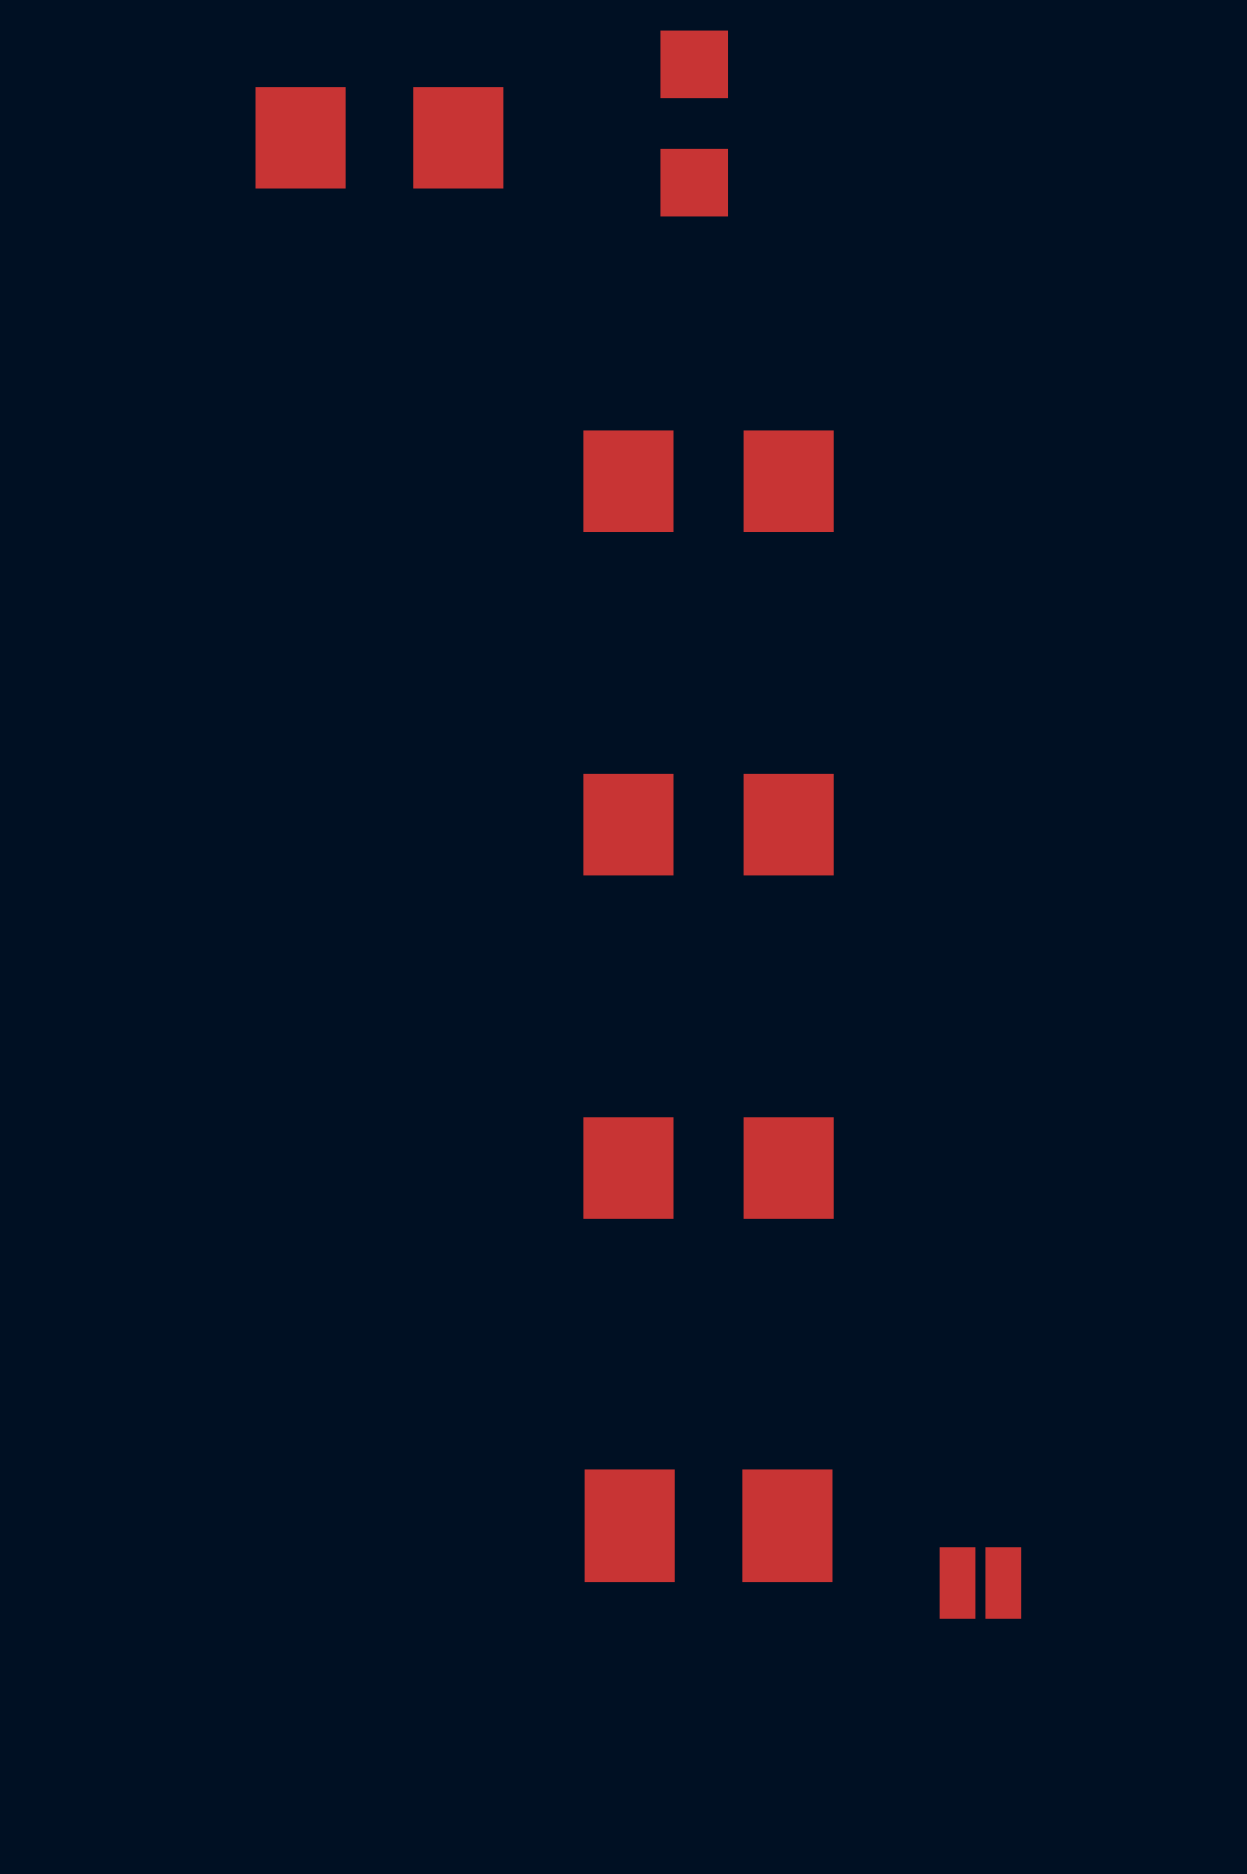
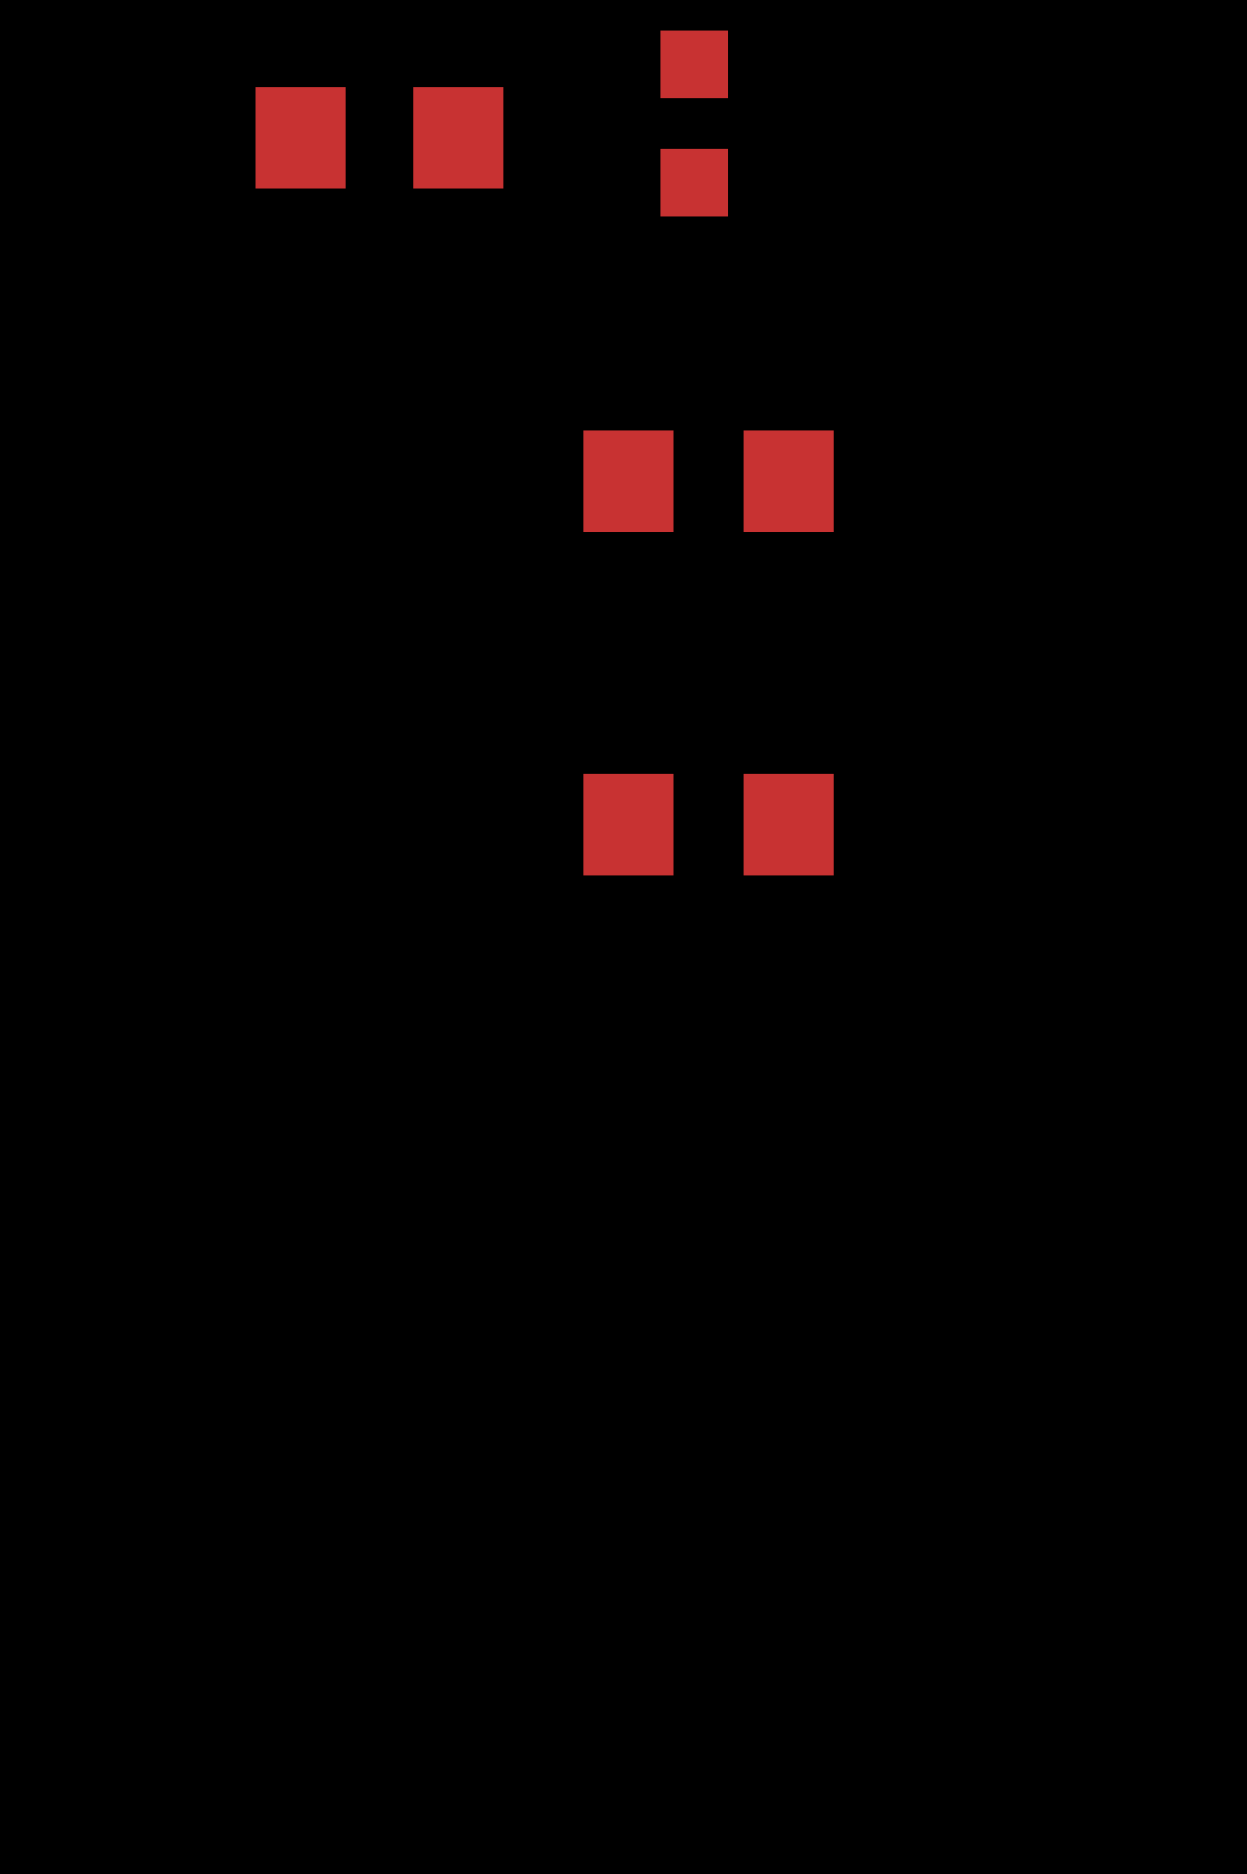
part: (708, 1168) -> none
part: (708, 1525) -> none
part: (980, 1583) -> none

